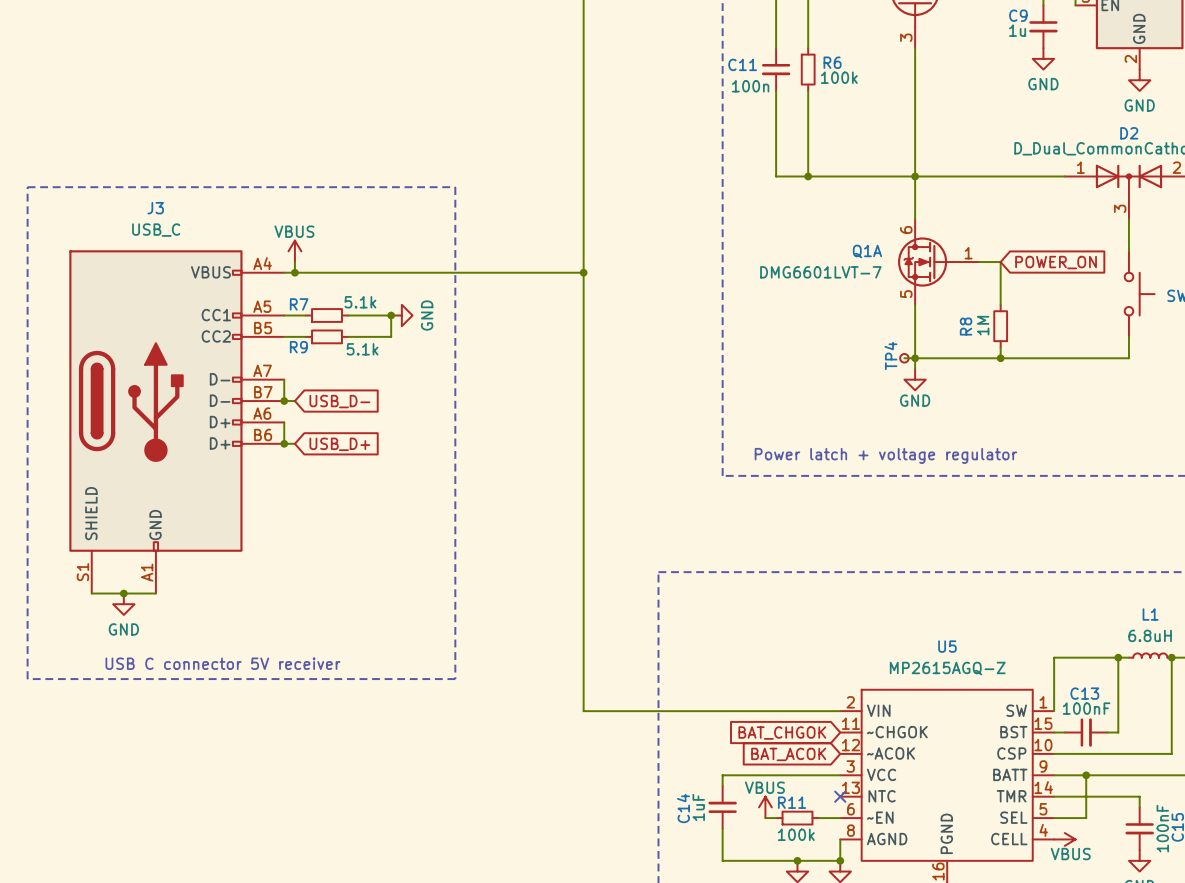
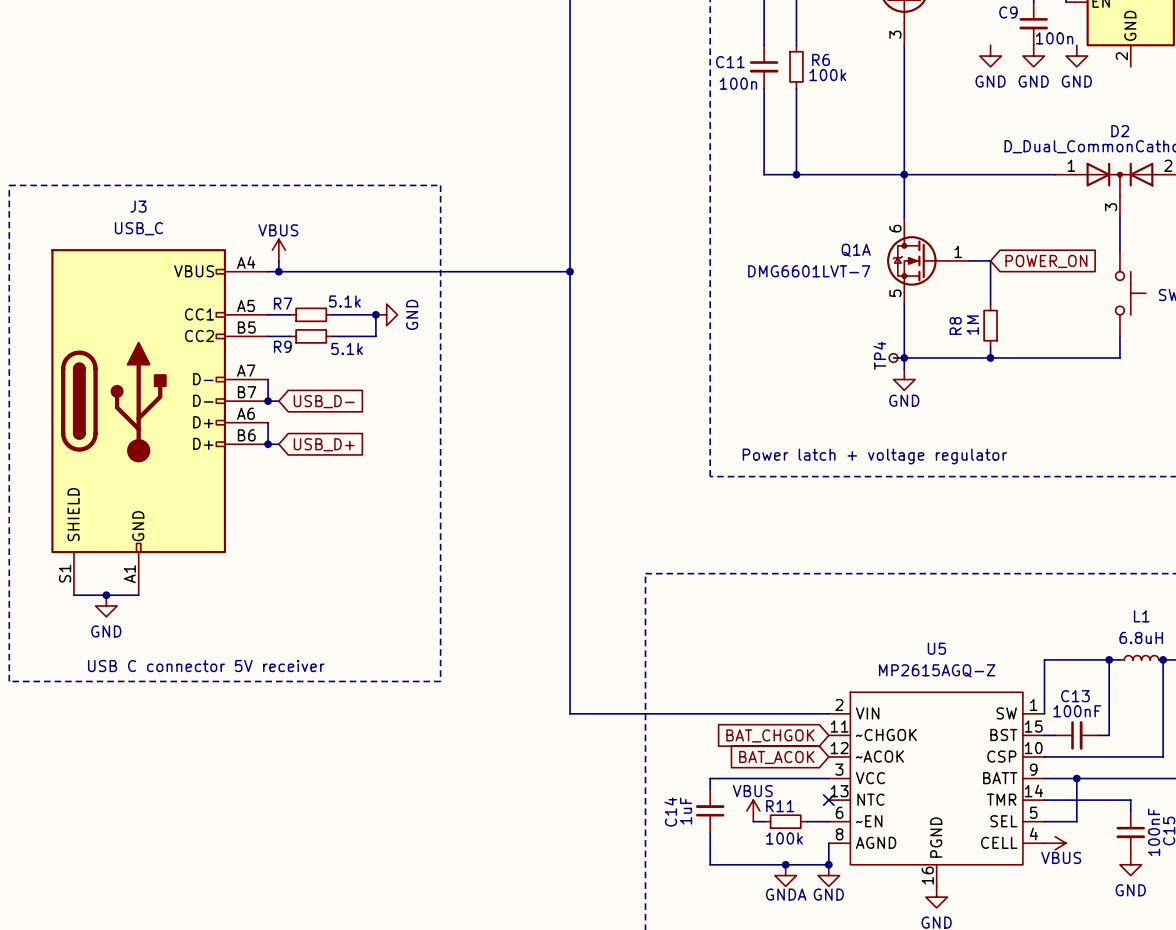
C9 value: 1u (1017, 30) -> 100n (1054, 38)
power symbol: none -> GND (990, 56)
power symbol position: GND (1139, 80) -> GND (1076, 56)

